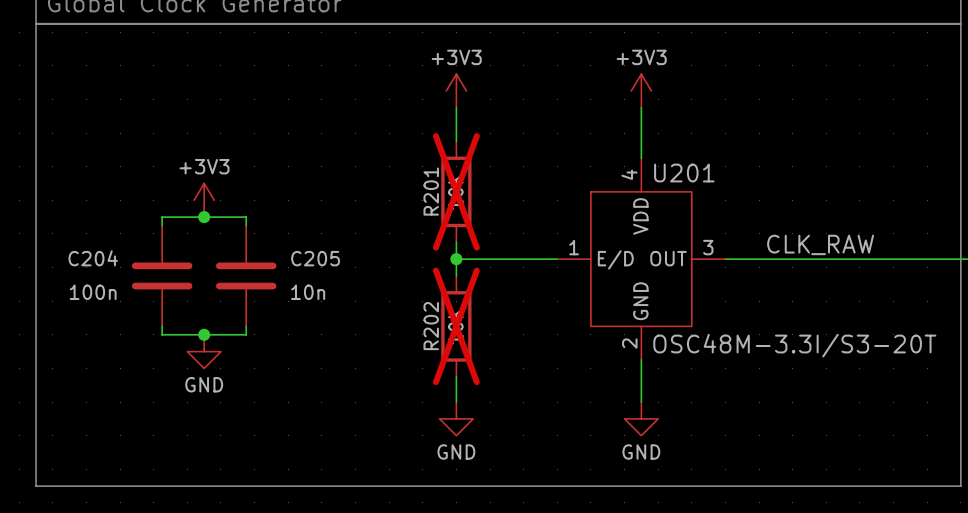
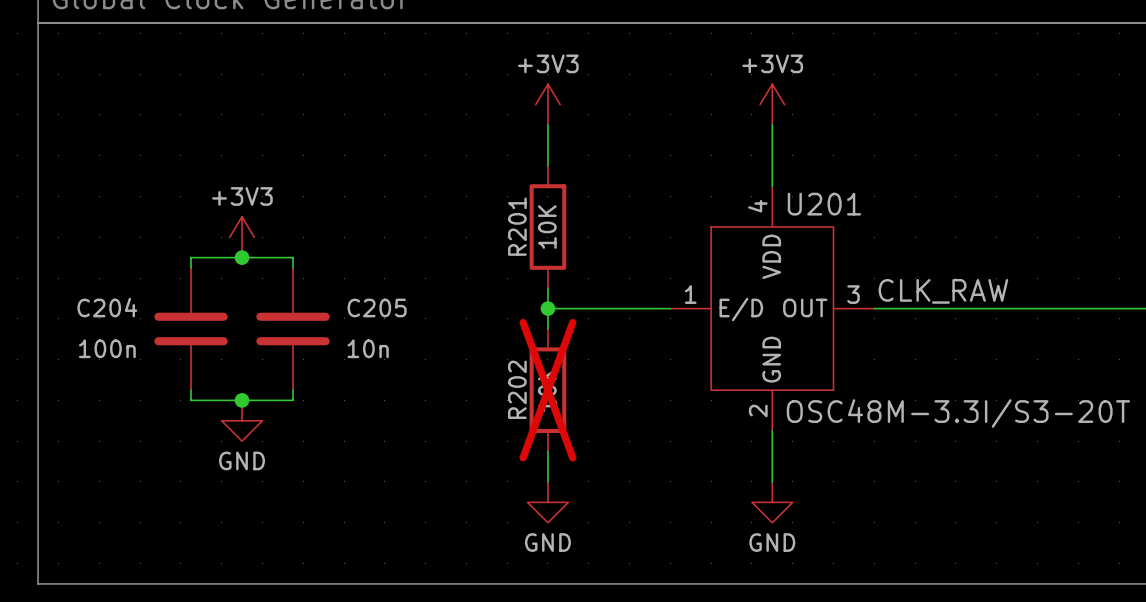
R201 do-not-place cross: (456, 191) -> none
label position: CLK_RAW (820, 244) -> CLK_RAW (943, 291)

